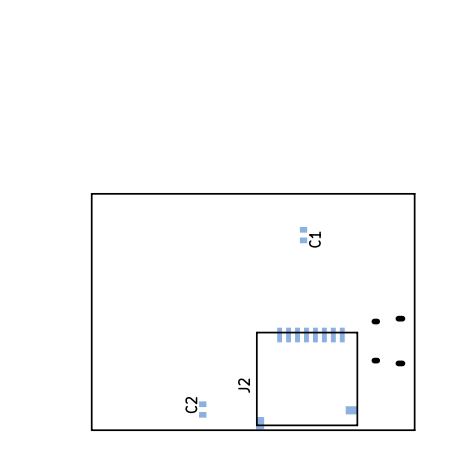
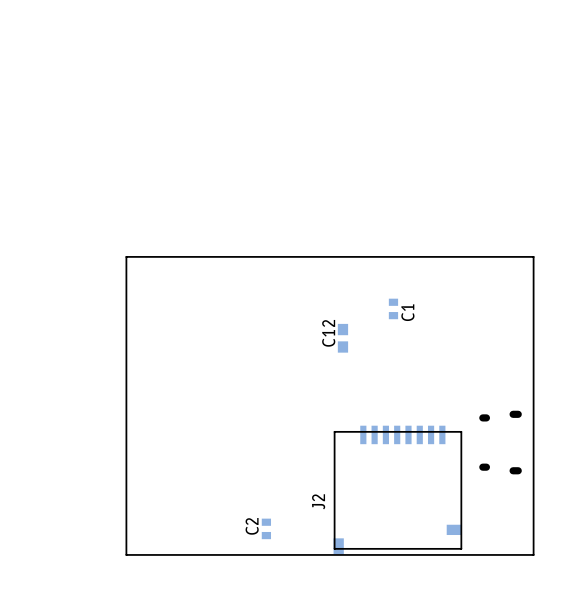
C12: none -> (342, 338)

